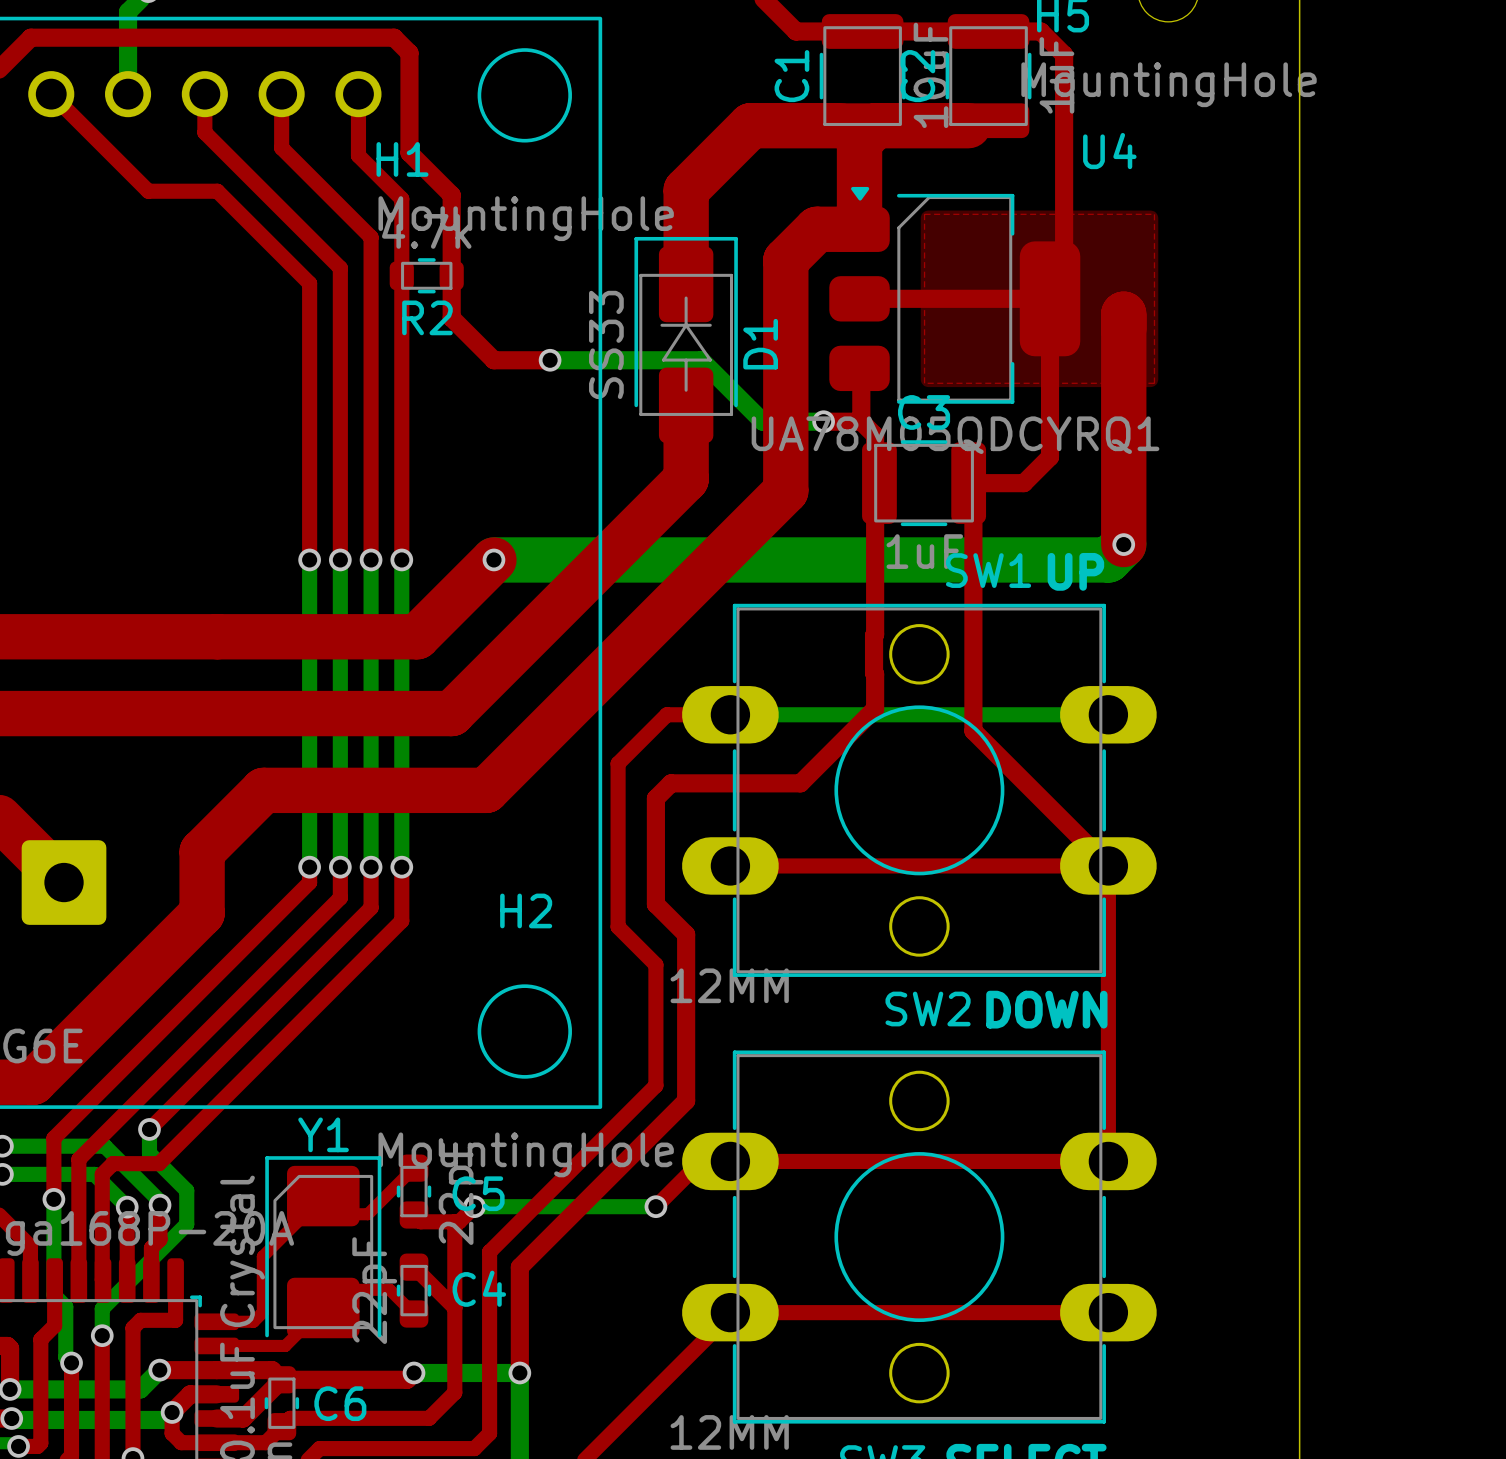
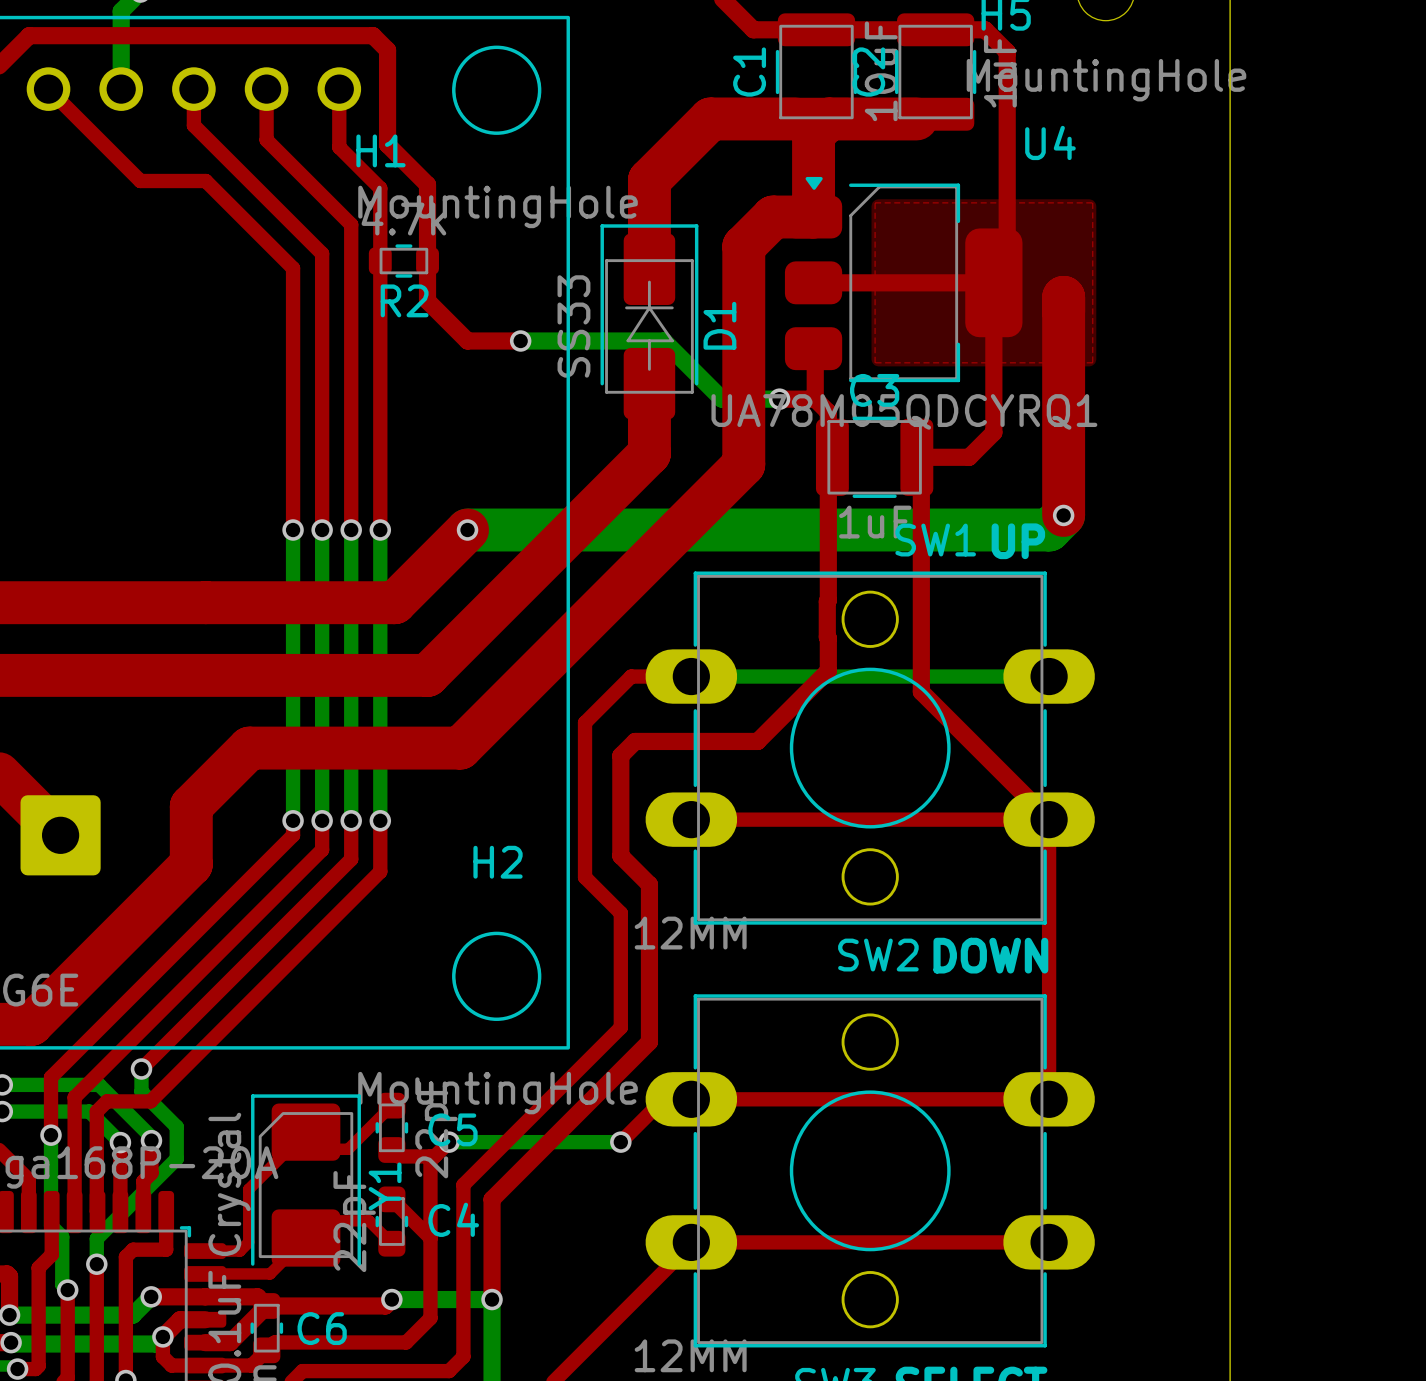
Y1 name rotation: 0° (323, 1134) -> 90° counterclockwise (385, 1186)
Y1 name position: Y1 (323, 1134) -> Y1 (385, 1186)

